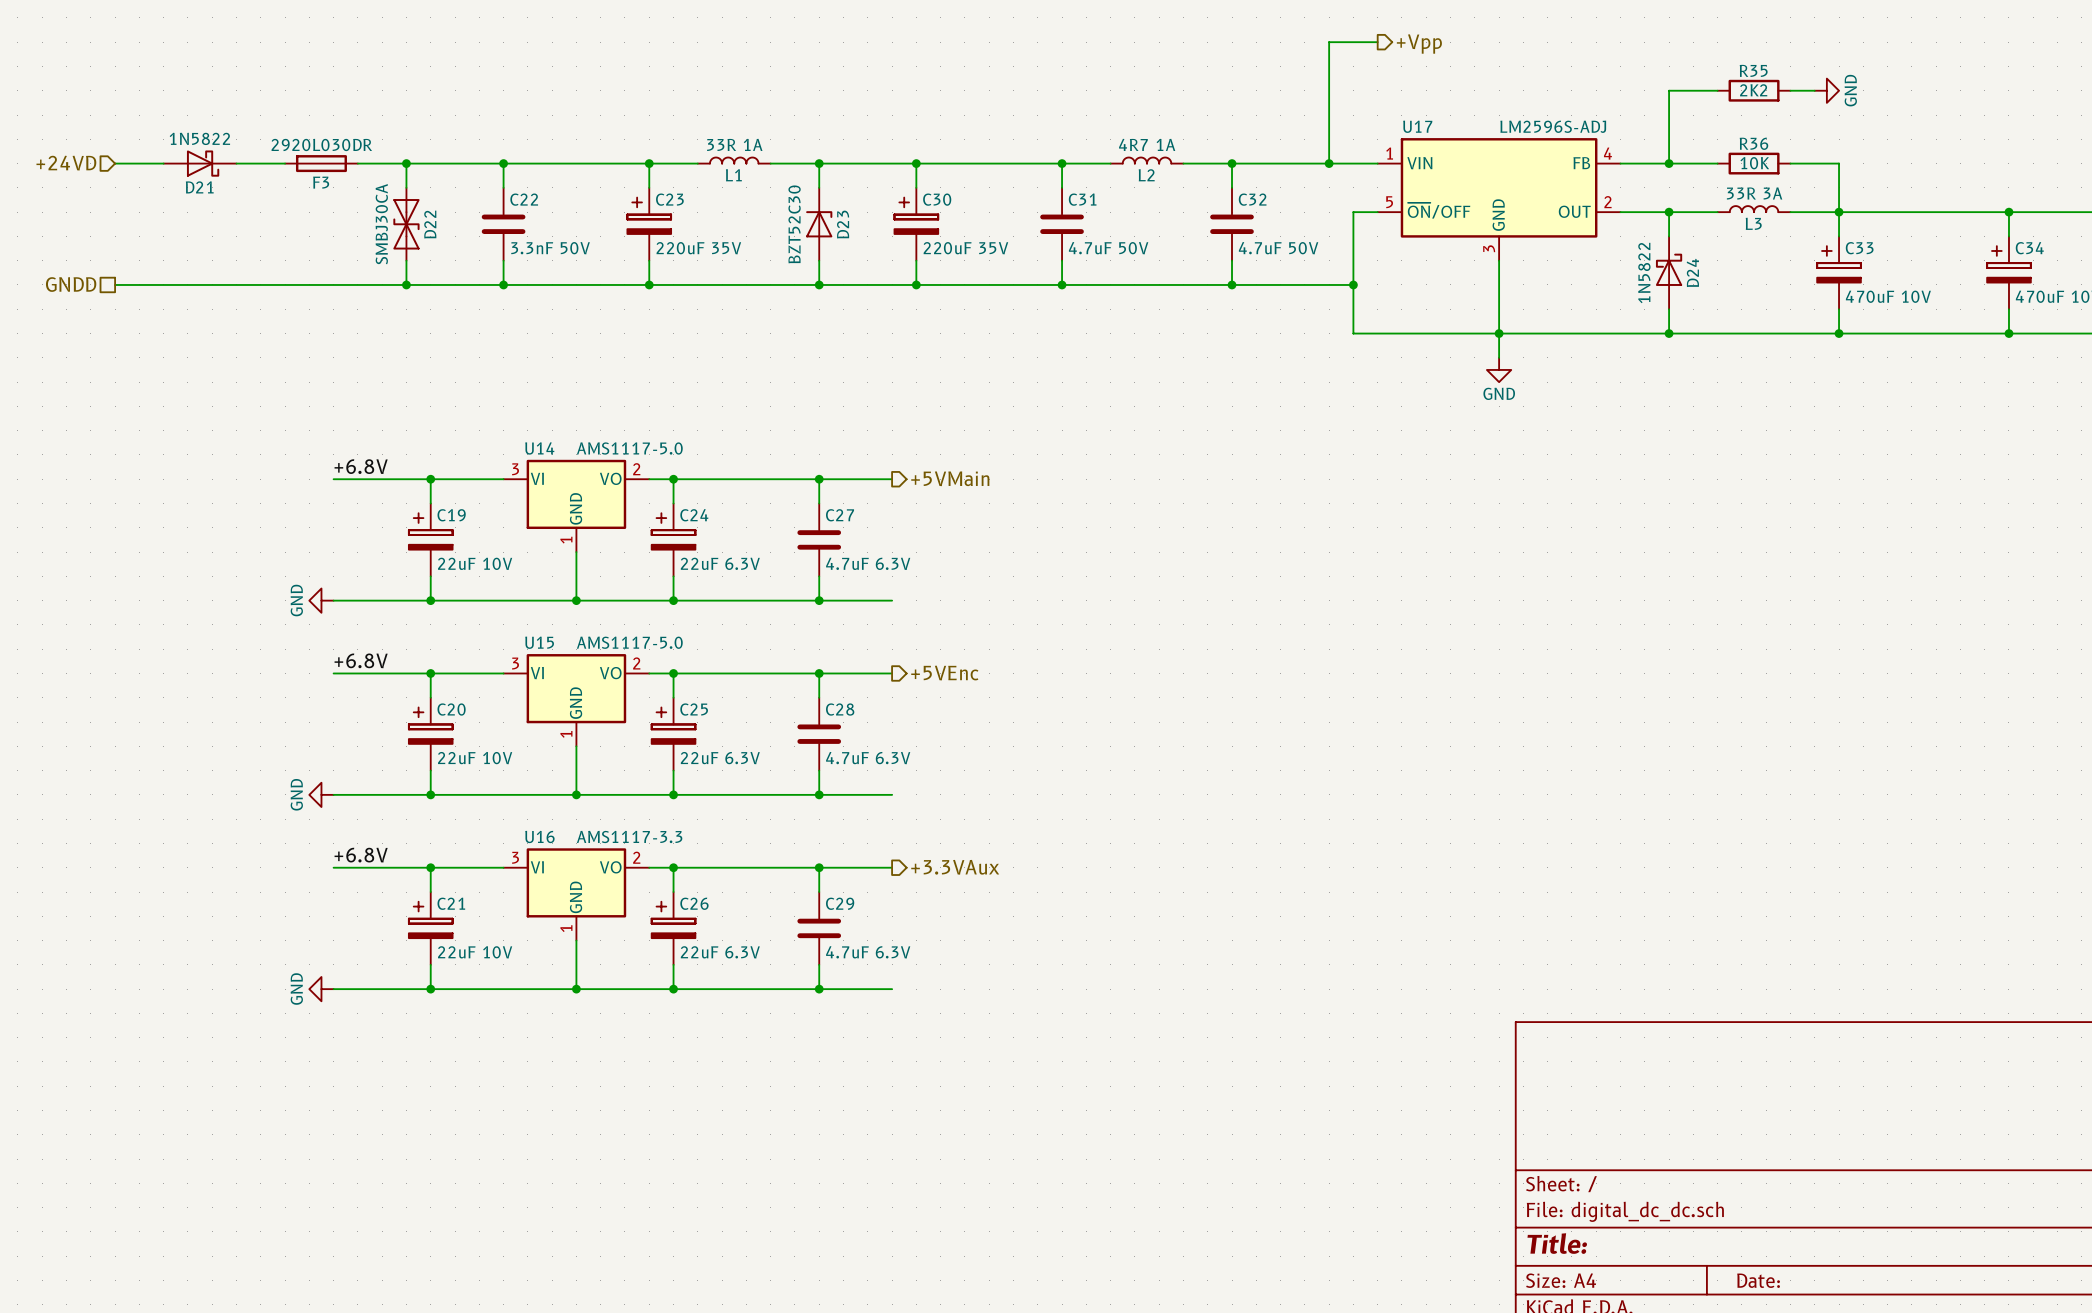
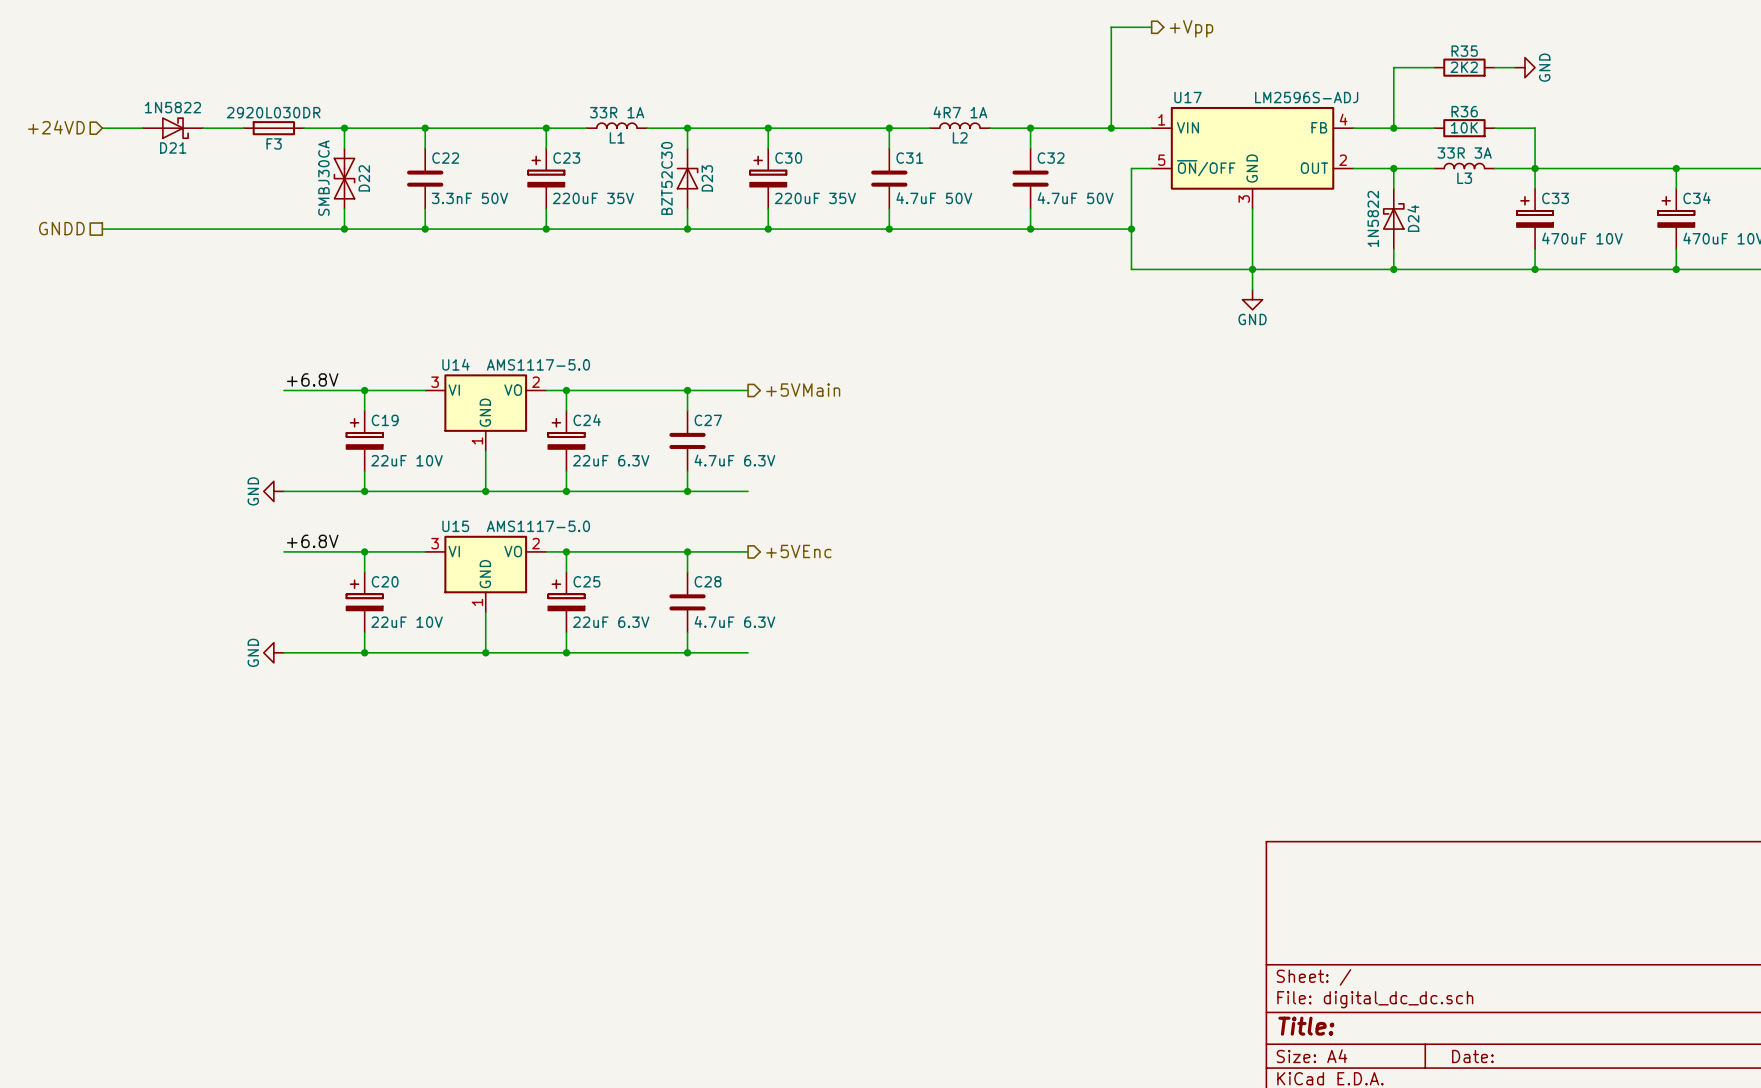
label: +6.8V (361, 855) -> none
wire: (333, 867) (503, 867) -> none
wire: (430, 867) (430, 892) -> none
junction: (430, 867) -> none
wire: (649, 867) (892, 867) -> none
wire: (673, 867) (673, 892) -> none
junction: (673, 867) -> none
wire: (819, 867) (819, 892) -> none
junction: (819, 867) -> none
hierarchical label: +3.3VAux (955, 867) -> none
U16: AMS1117-3.3 (576, 894) -> none
C21: 22uF 10V (430, 928) -> none
C26: 22uF 6.3V (673, 928) -> none
C29: 4.7uF 6.3V (819, 928) -> none
wire: (576, 940) (576, 989) -> none
wire: (430, 964) (430, 989) -> none
wire: (673, 964) (673, 989) -> none
wire: (819, 964) (819, 989) -> none
power symbol: GND (321, 989) -> none
wire: (333, 989) (892, 989) -> none
junction: (430, 989) -> none
junction: (576, 989) -> none
junction: (673, 989) -> none
junction: (819, 989) -> none

